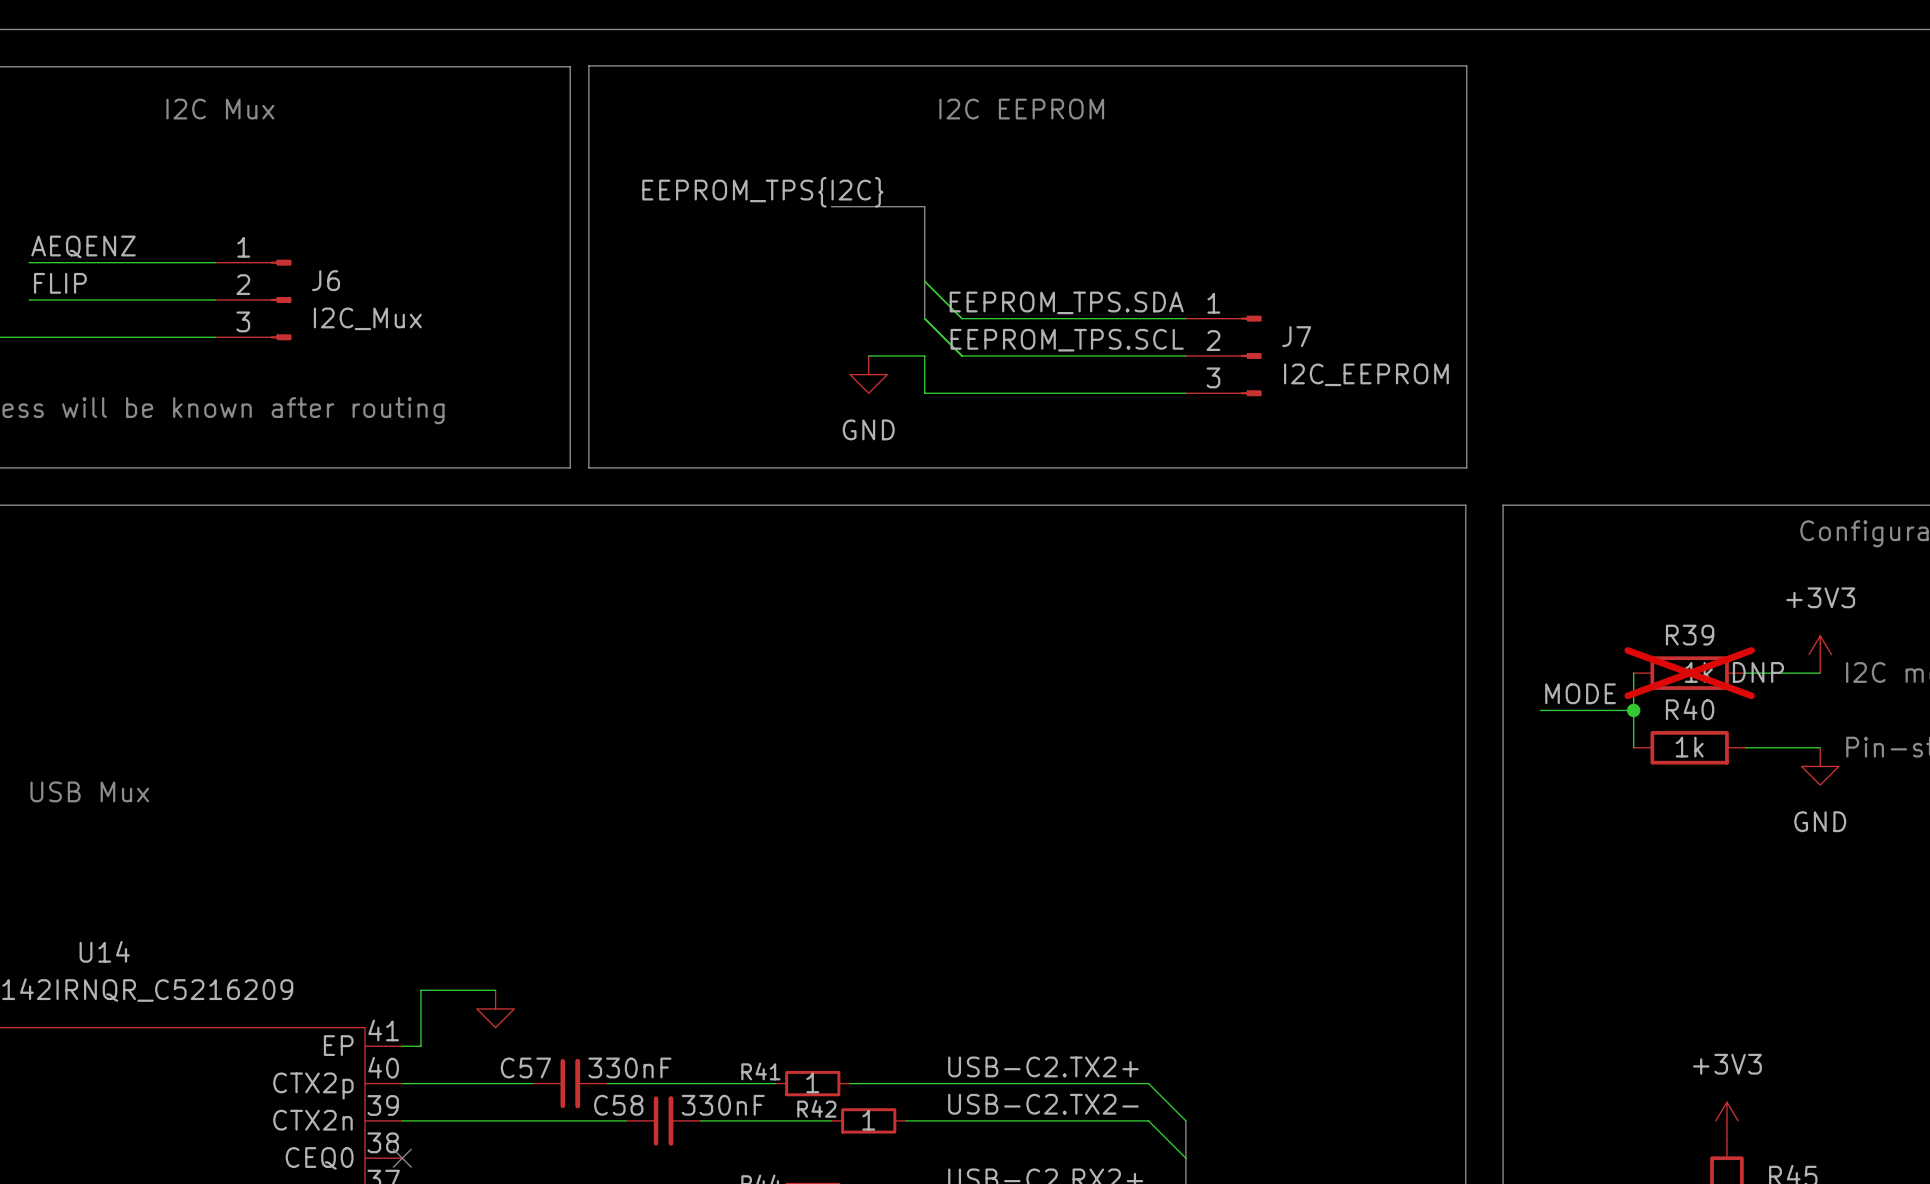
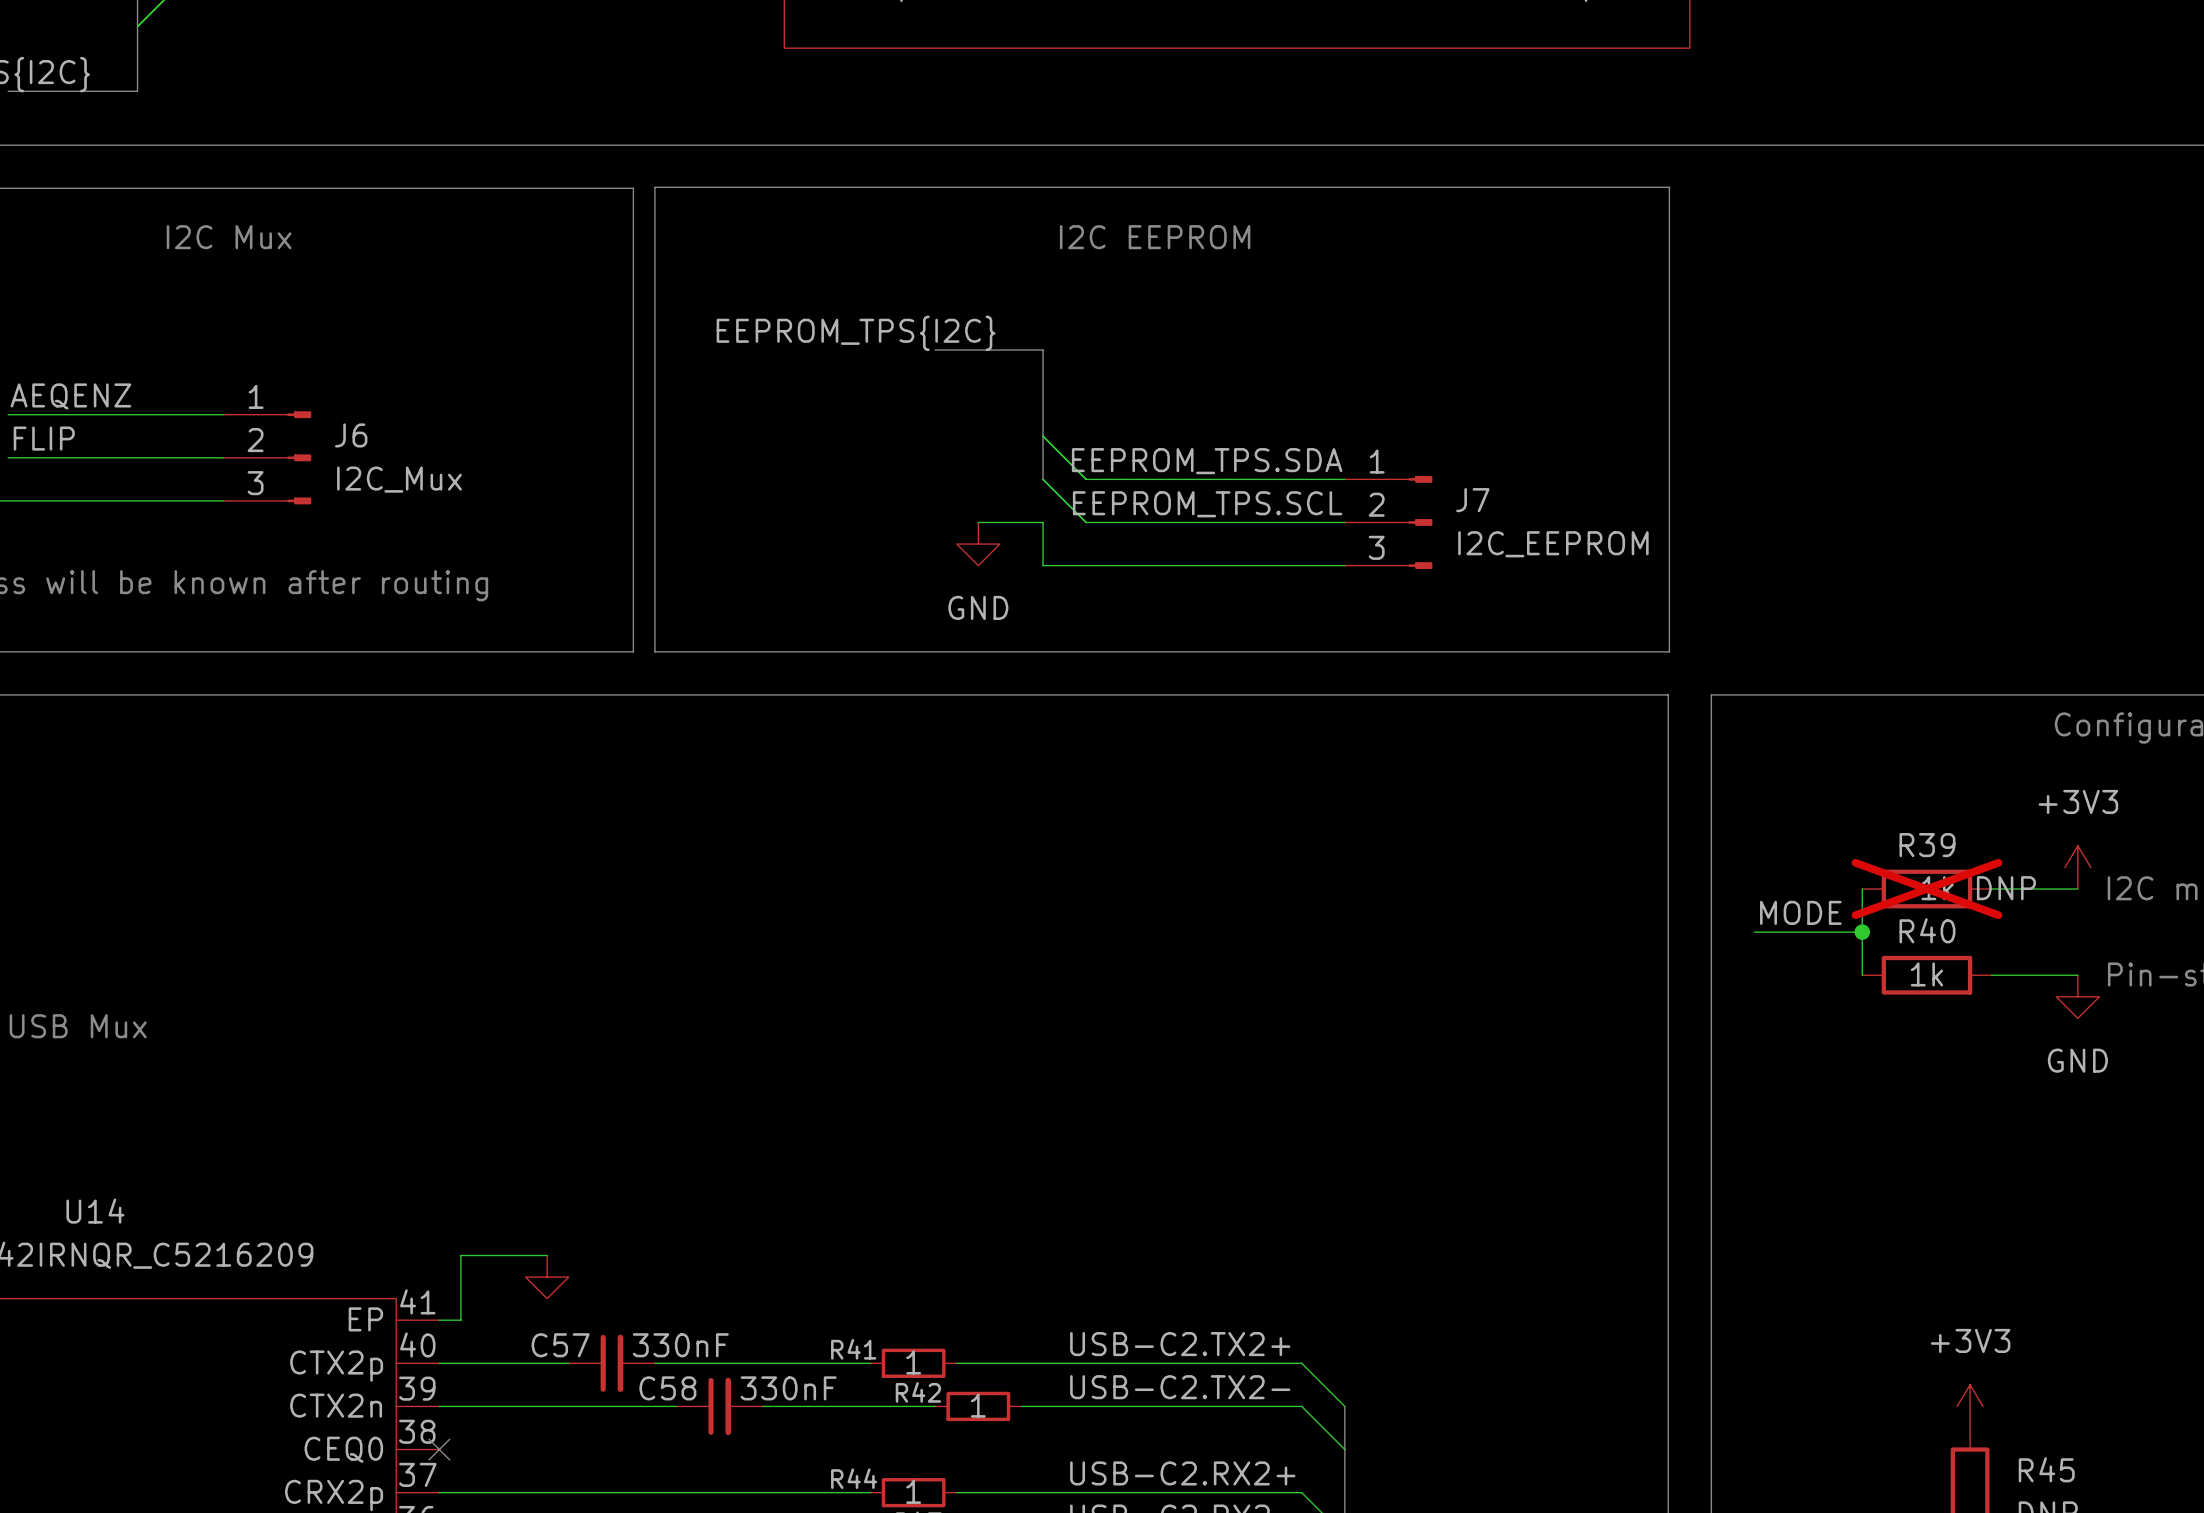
C57 position: (570, 1083) -> (611, 1363)
C58 position: (663, 1120) -> (719, 1406)

